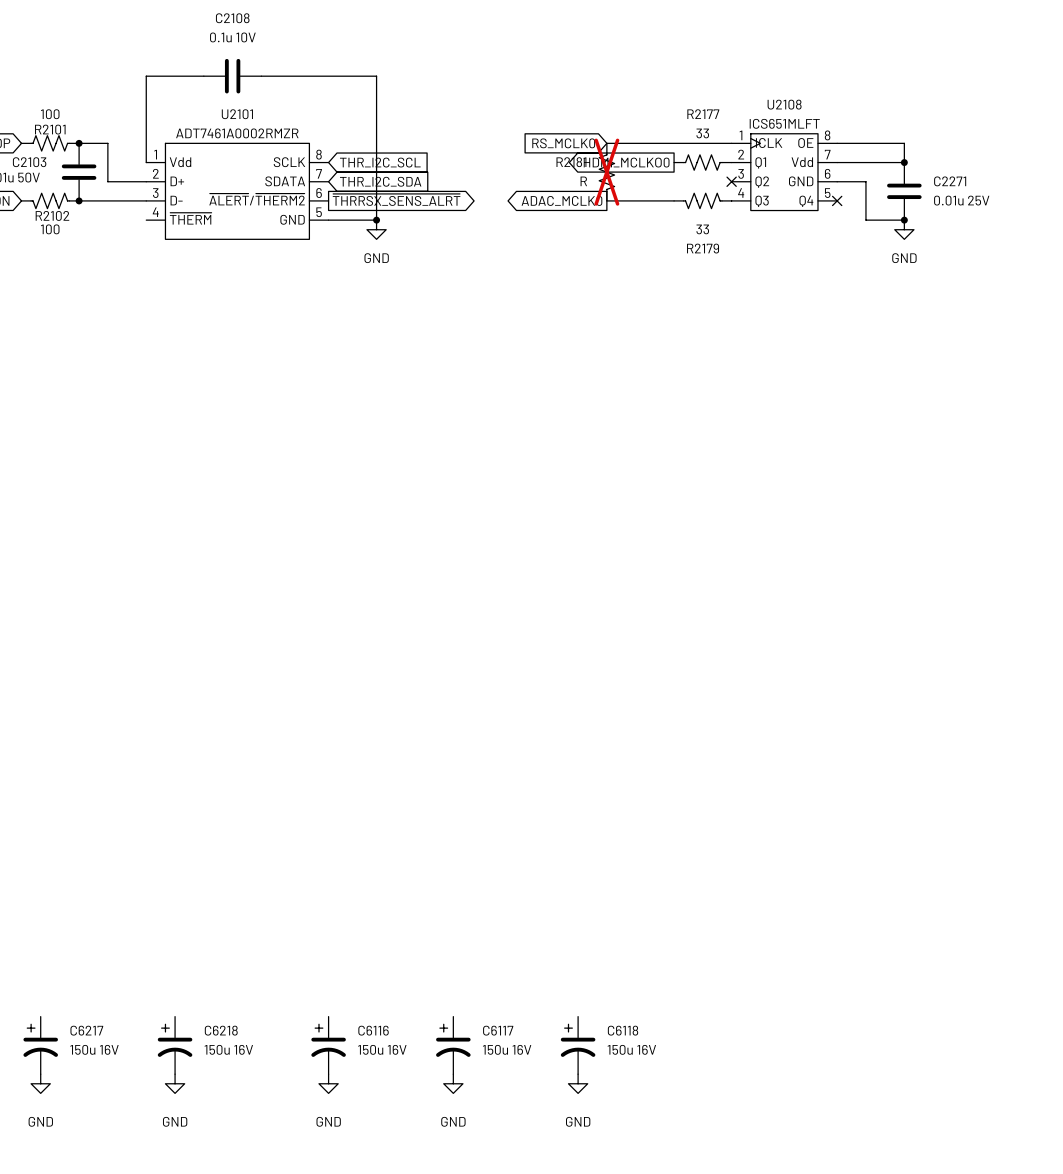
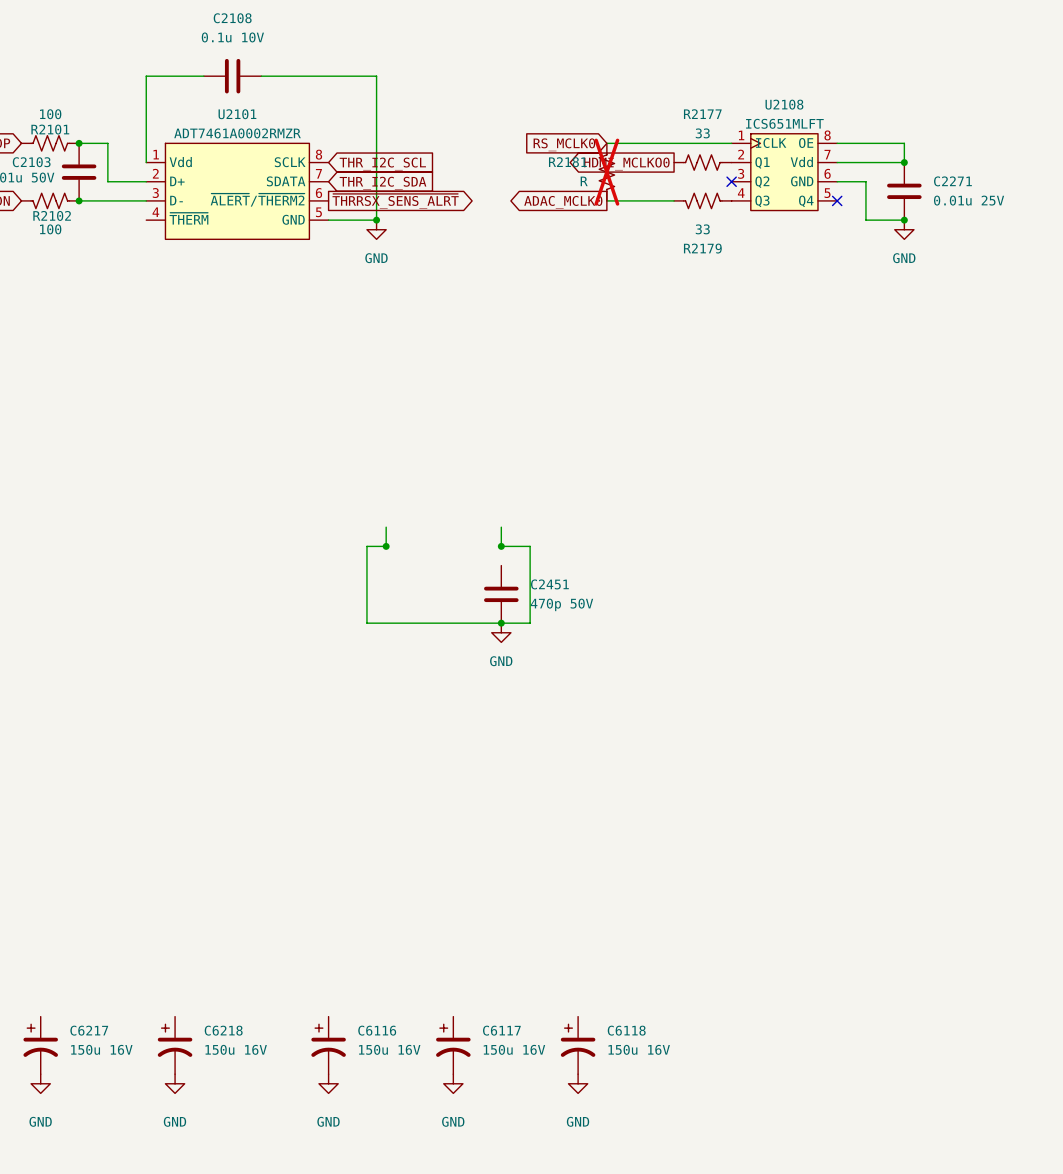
wire: none -> (386, 527) (386, 546) (366, 546) (366, 623) (530, 623) (530, 546) (501, 546) (501, 527)
junction: none -> (386, 546)
junction: none -> (501, 546)
C2451: none -> 470p 50V (501, 594)
junction: none -> (501, 623)
power symbol: none -> GND (501, 632)

